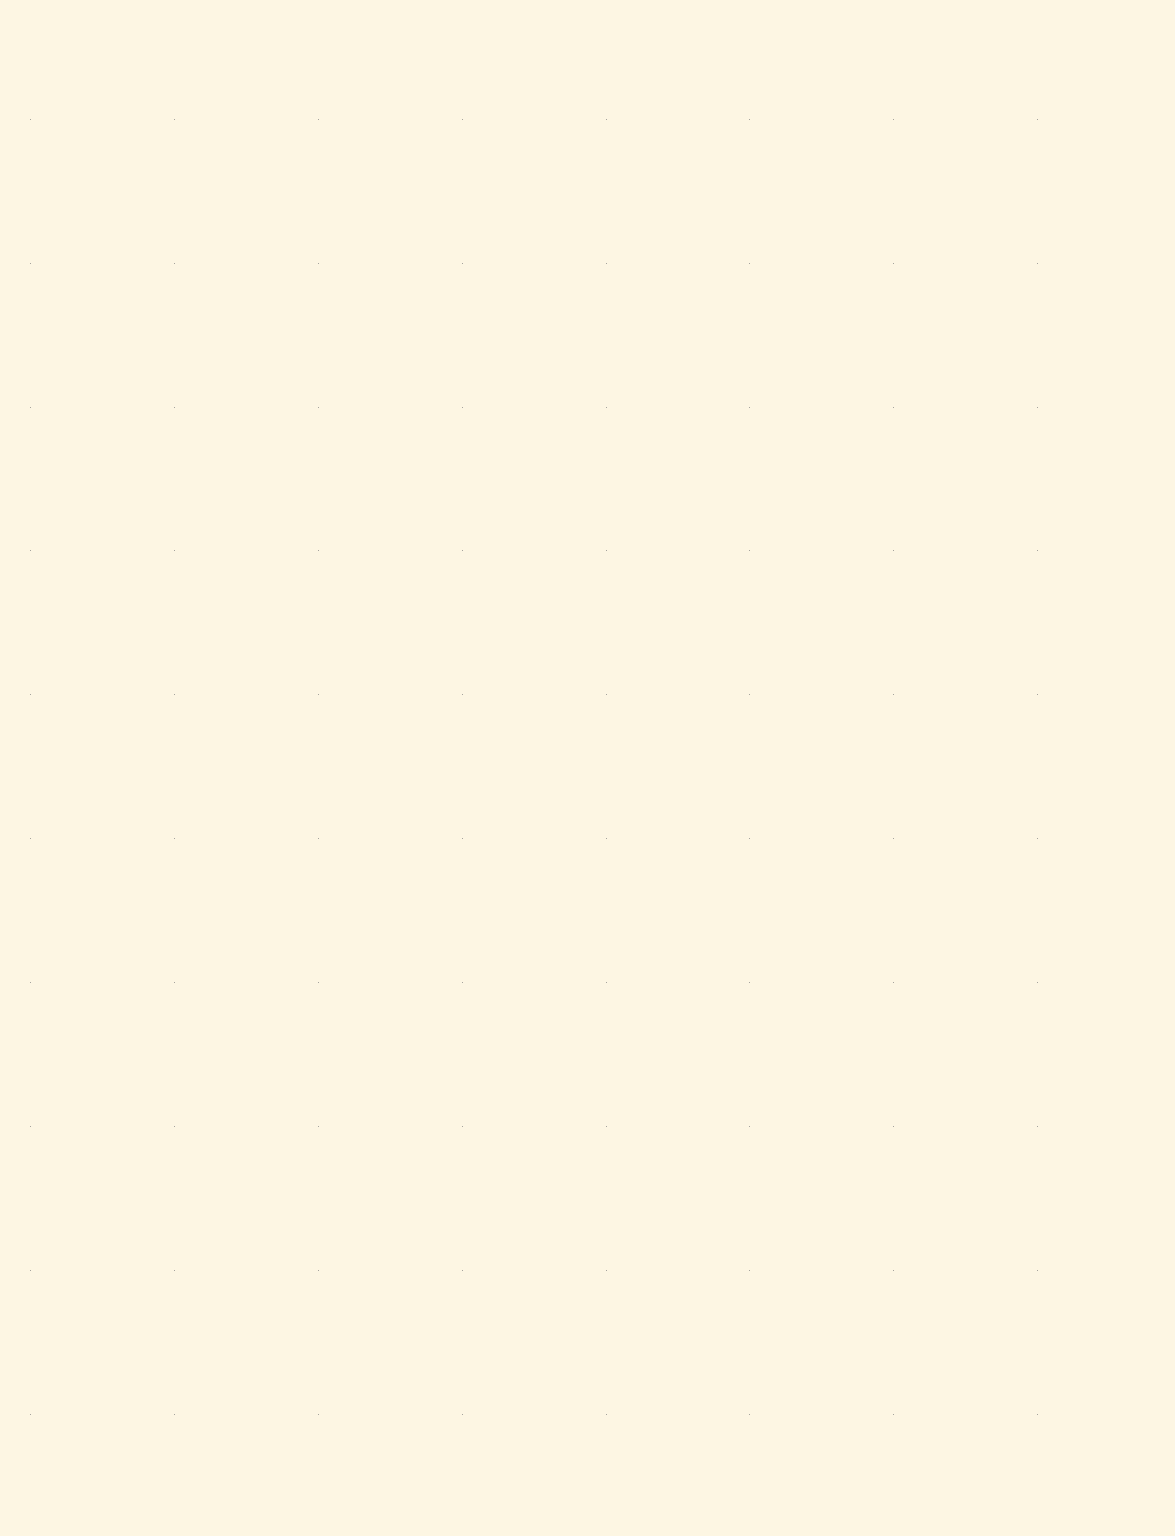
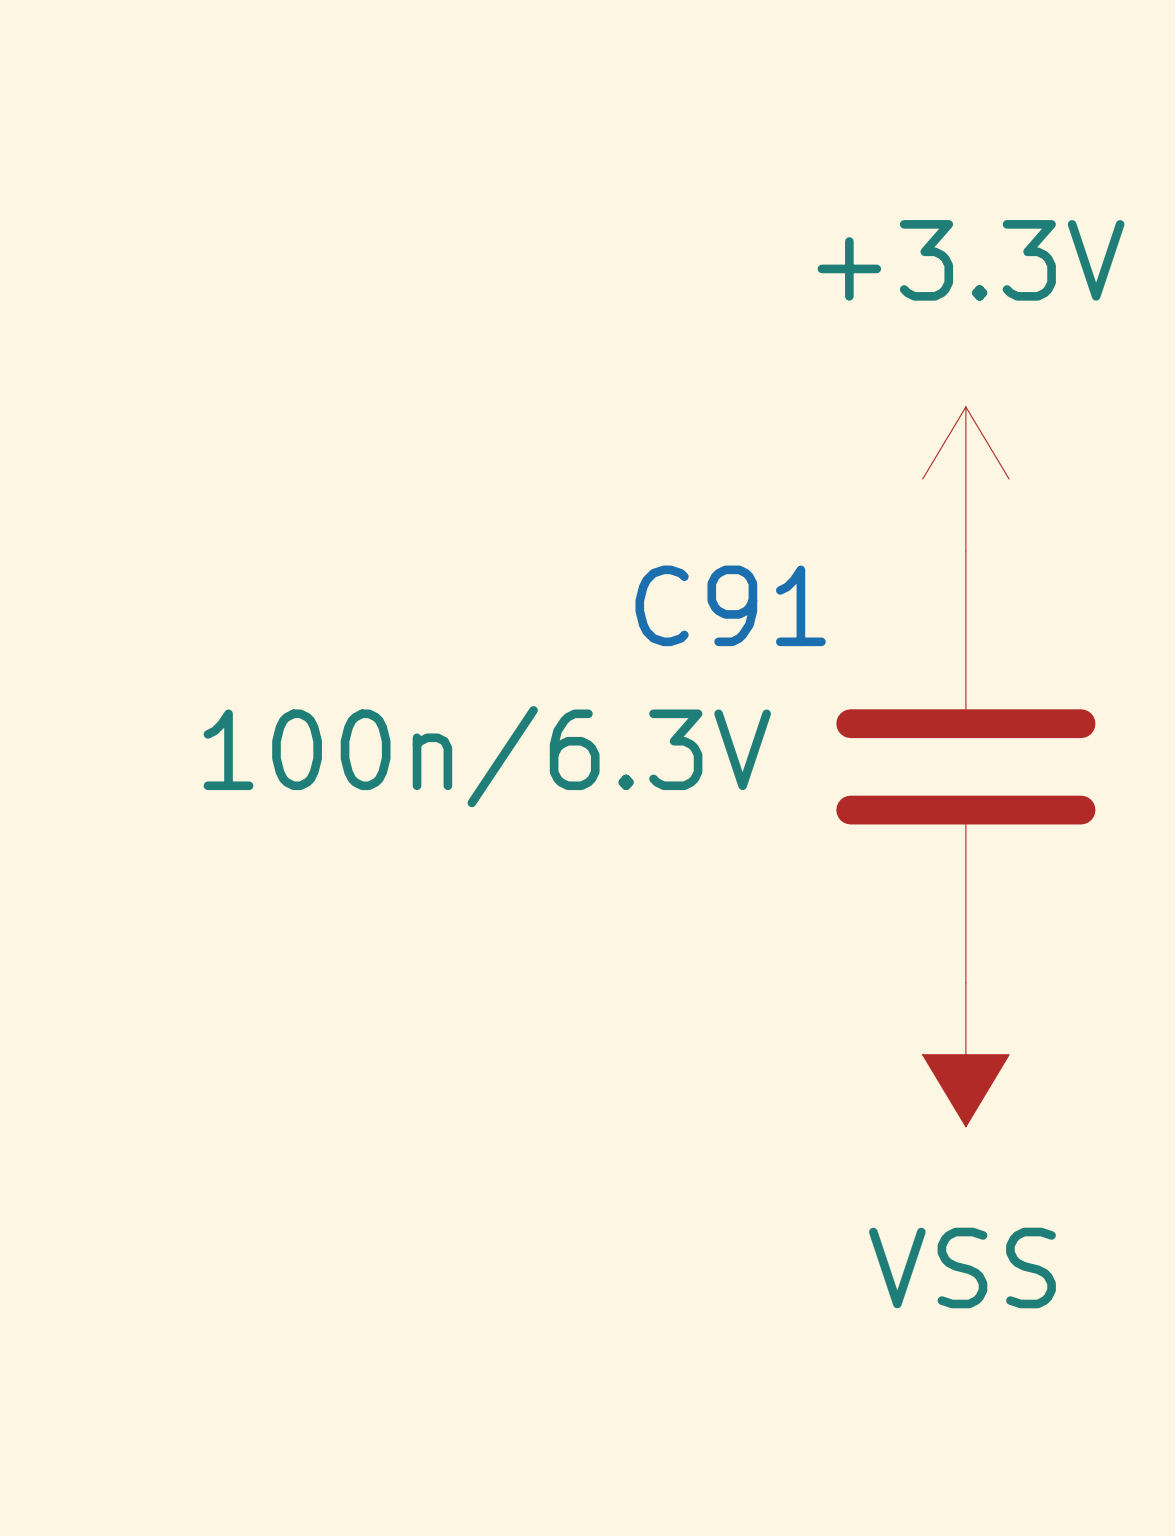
power symbol: none -> +3.3V (965, 478)
C91: none -> 100n/6.3V (965, 766)
power symbol: none -> VSS (965, 1054)

